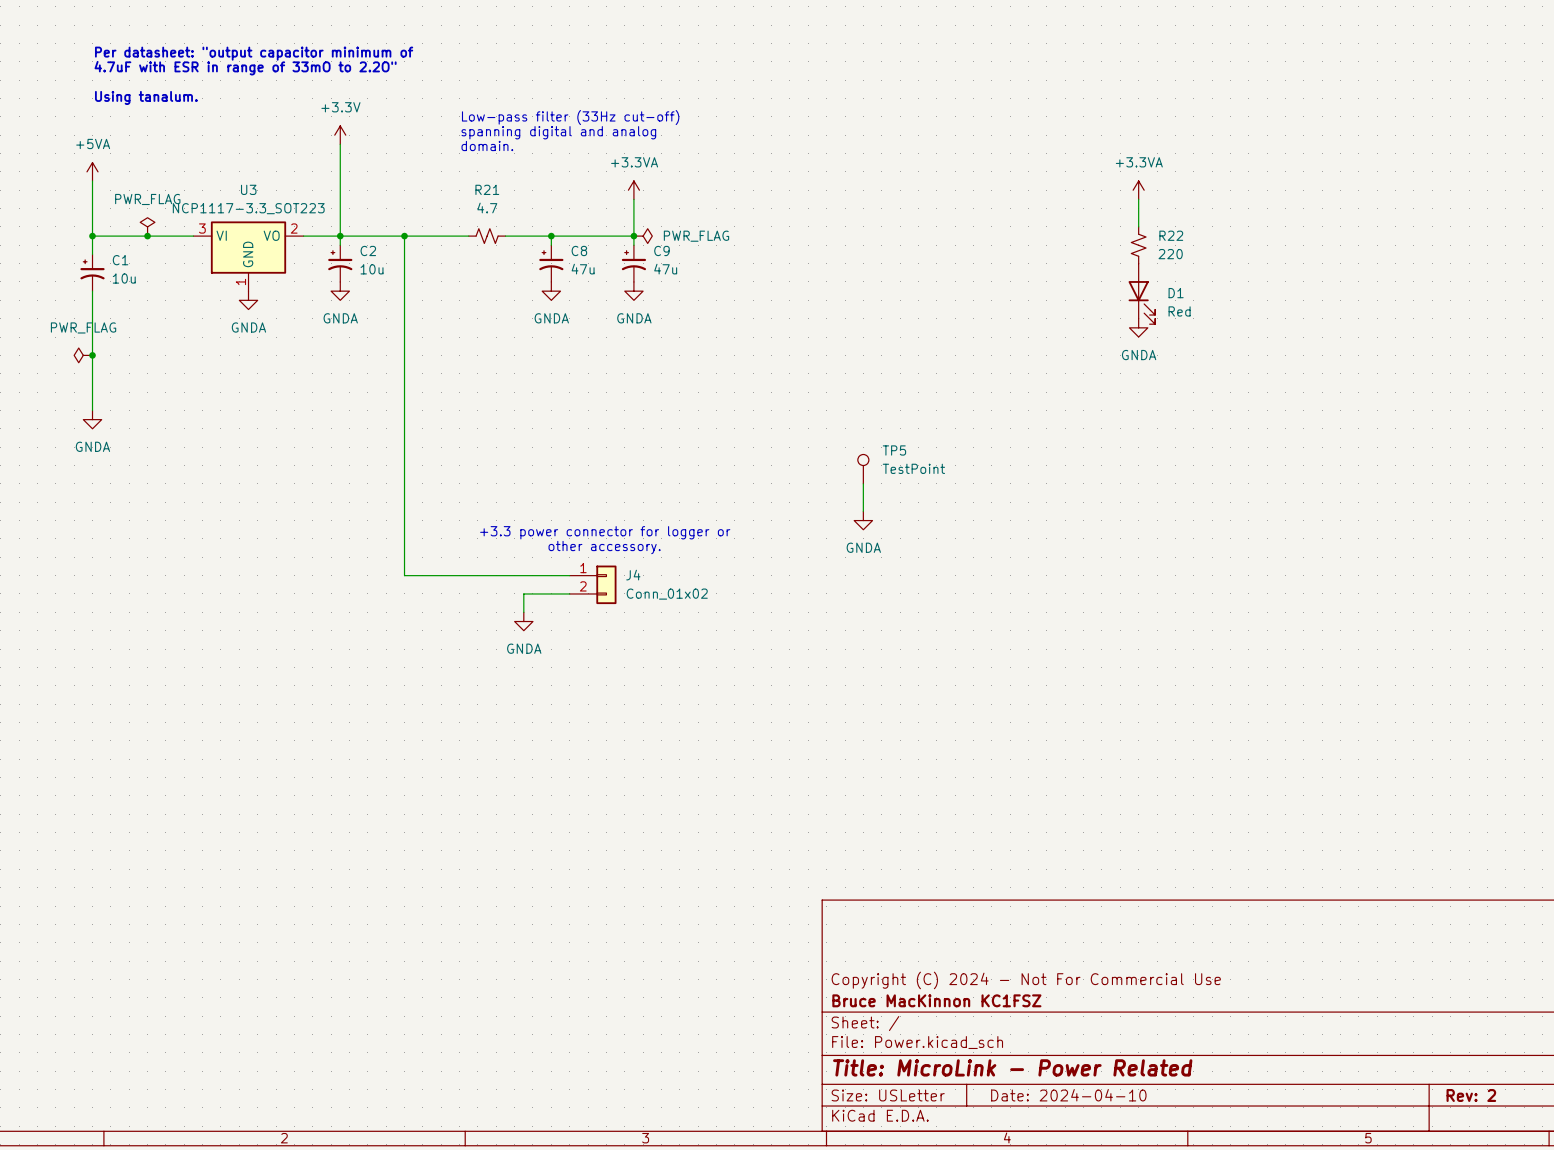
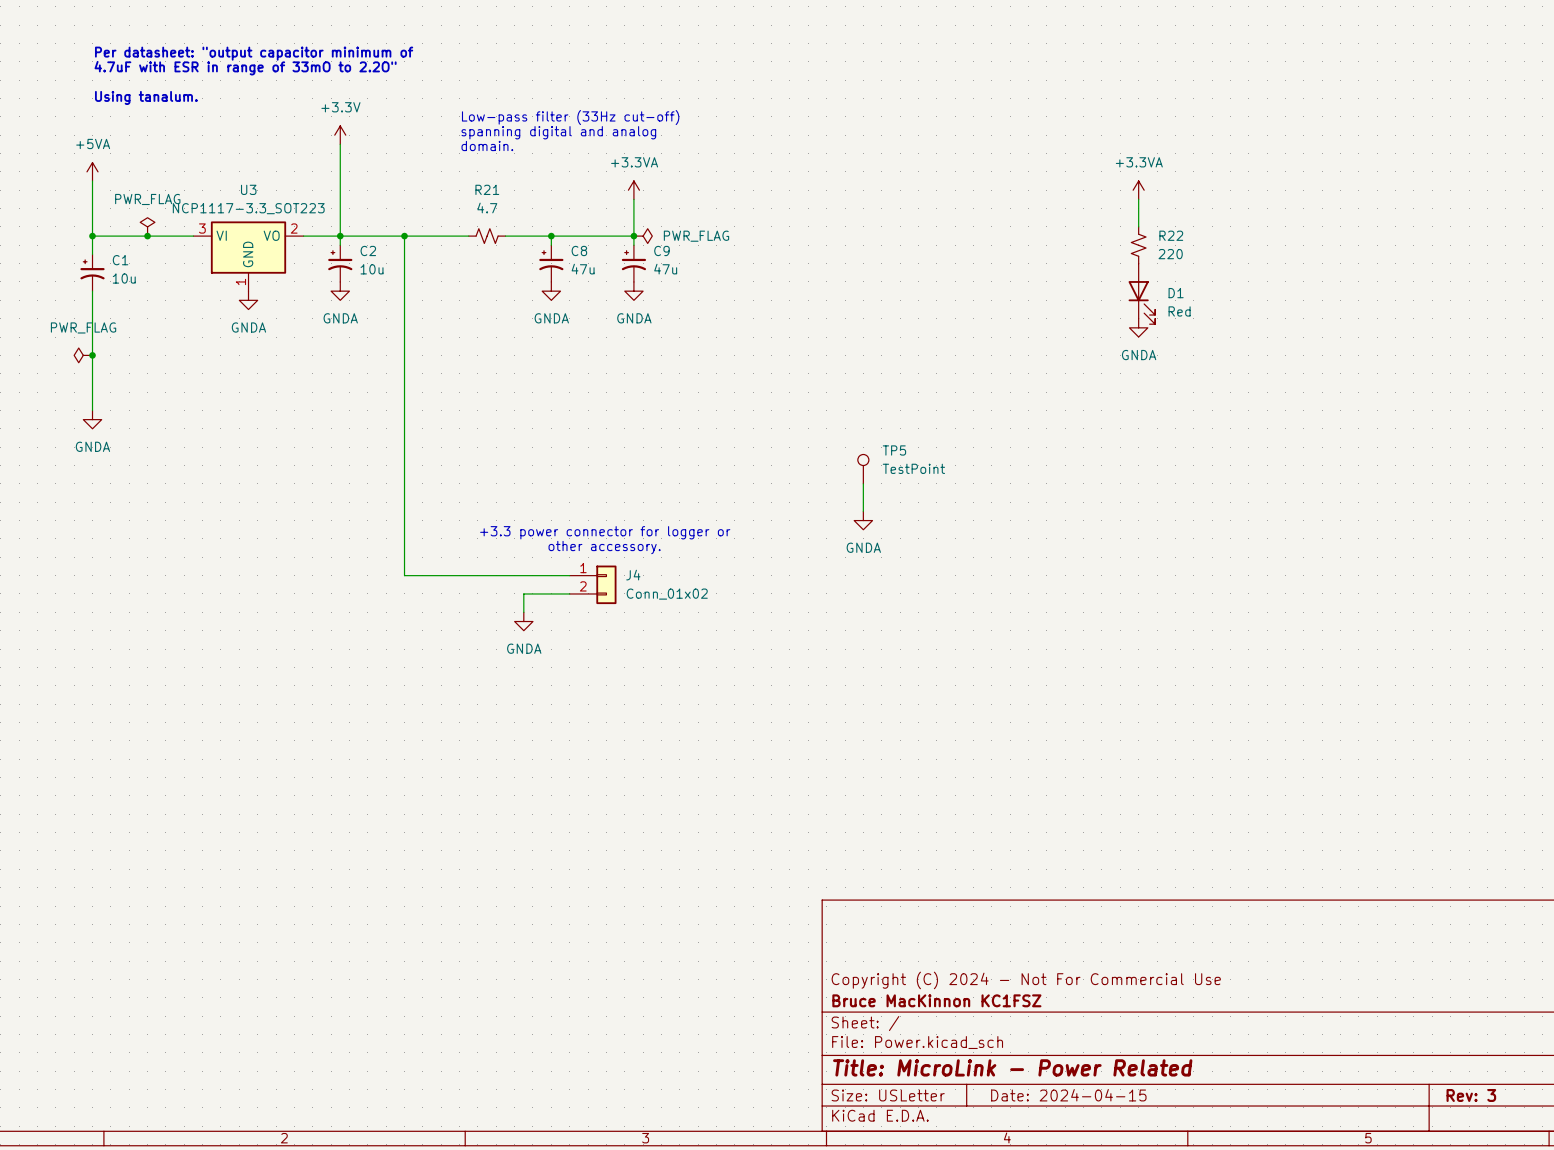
title block: Date: 2024-04-10 (1068, 1095) -> Date: 2024-04-15 (1068, 1095)
title block: Rev: 2 (1471, 1095) -> Rev: 3 (1471, 1095)

